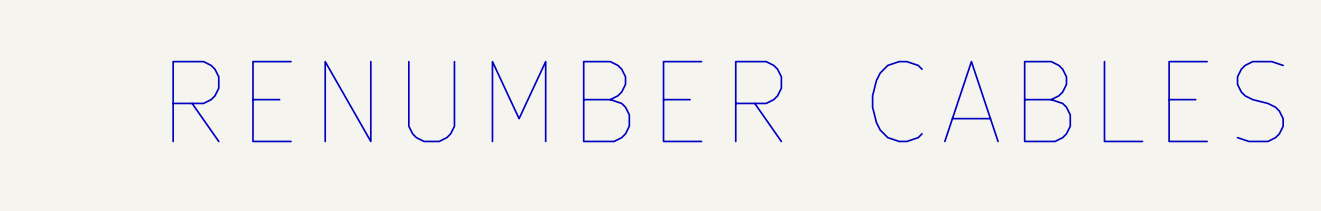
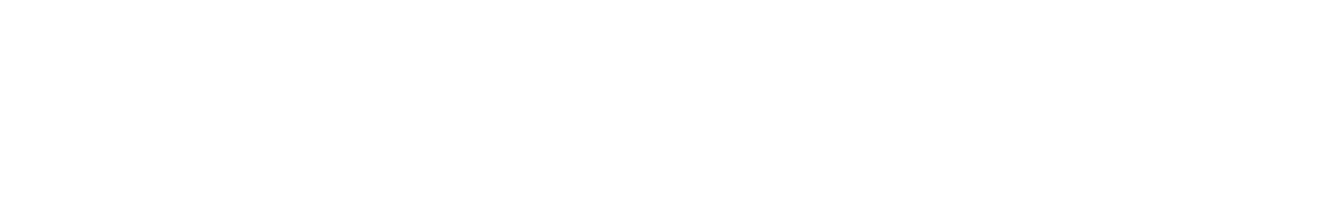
text: RENUMBER CABLES (728, 101) -> none

